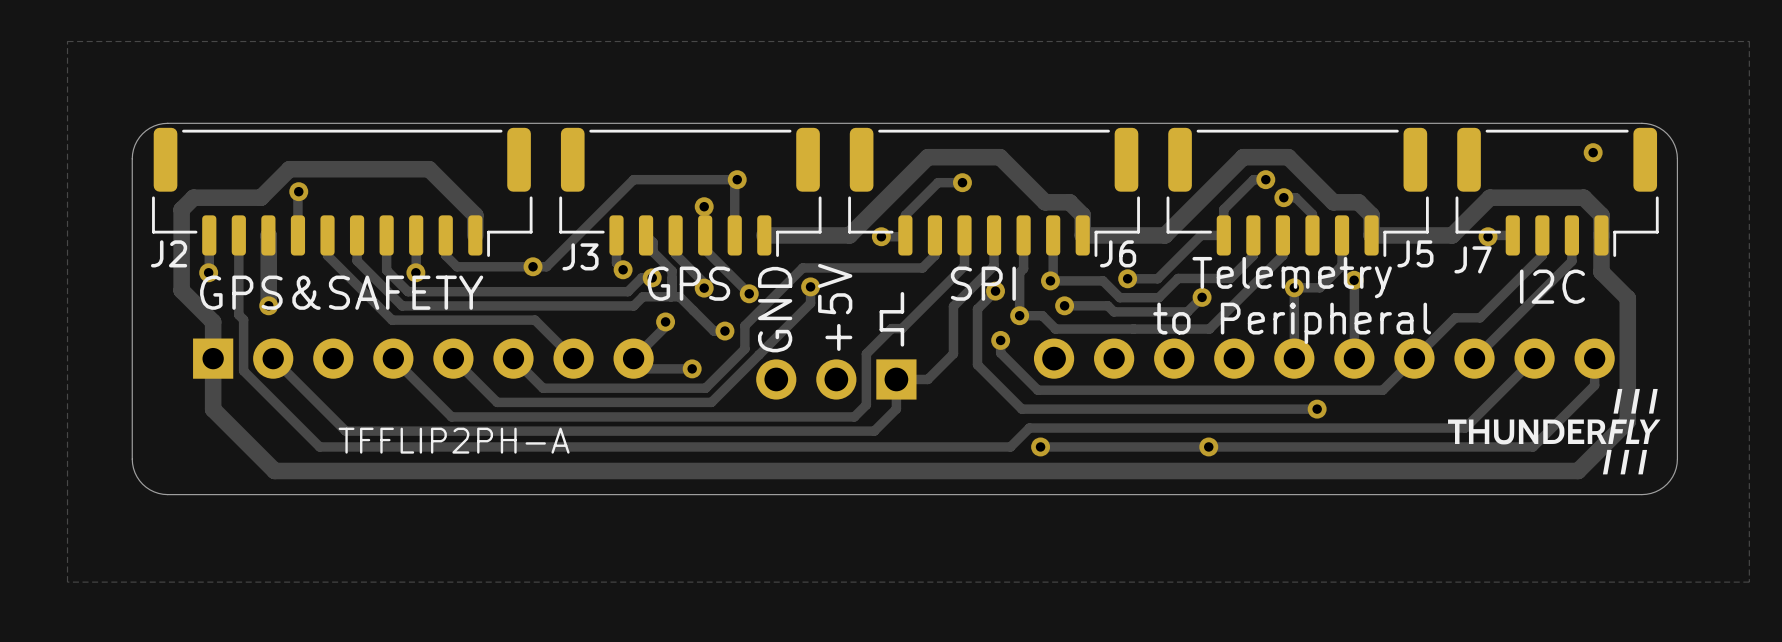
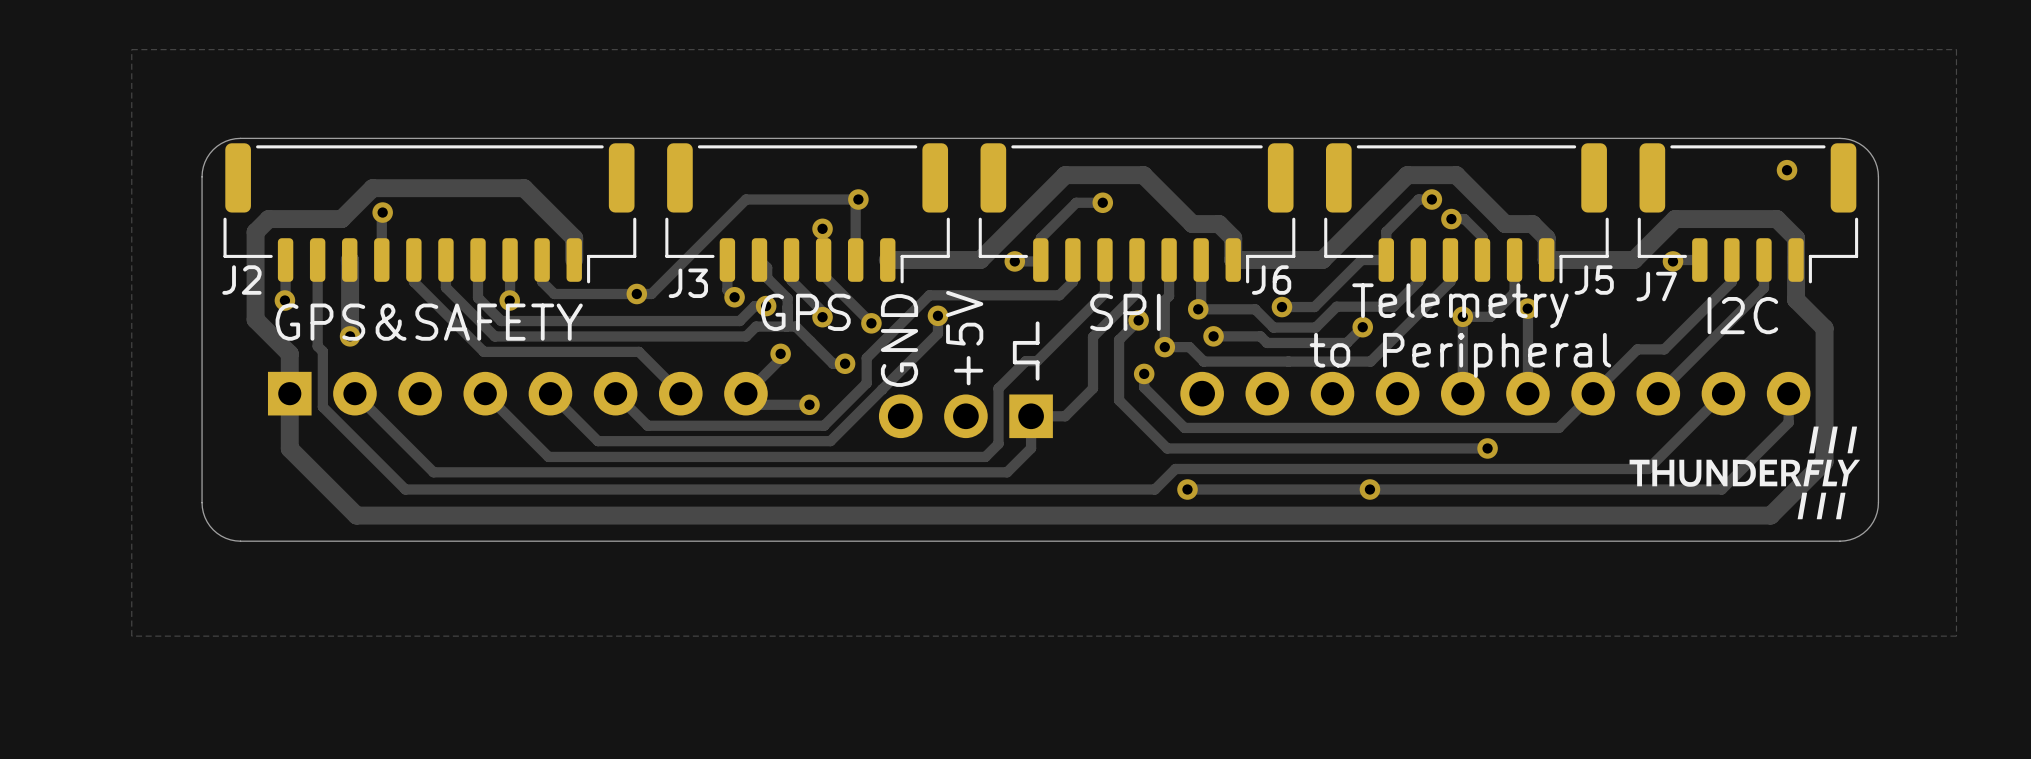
text: TFFLIP2PH-A (454, 440) -> none

